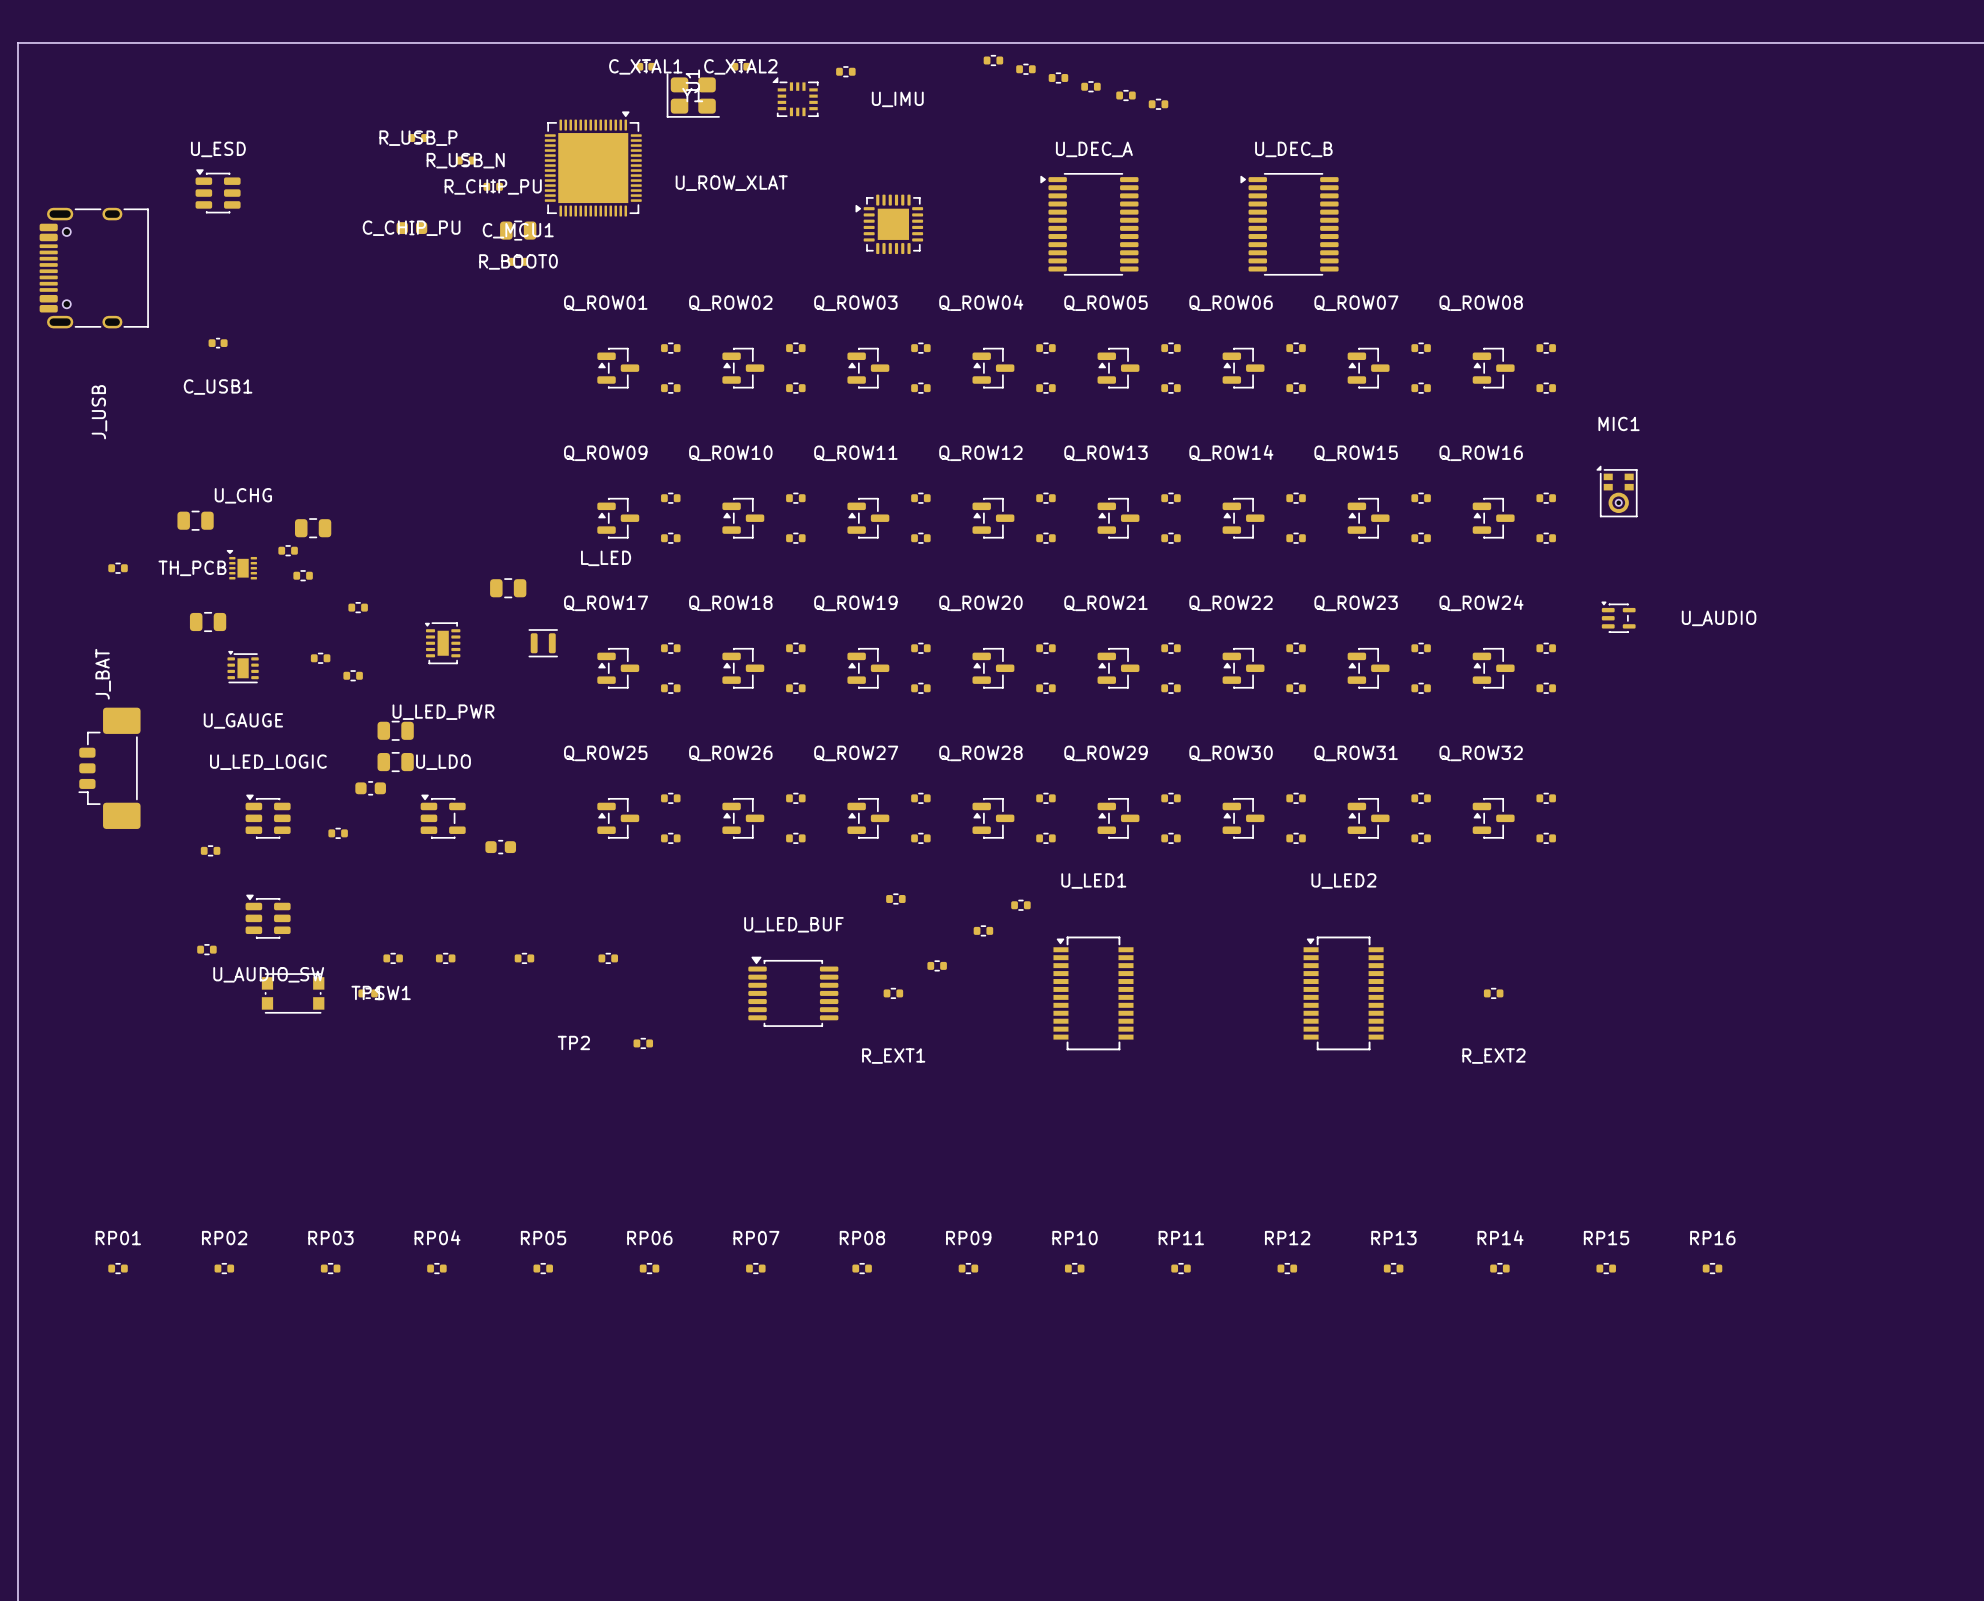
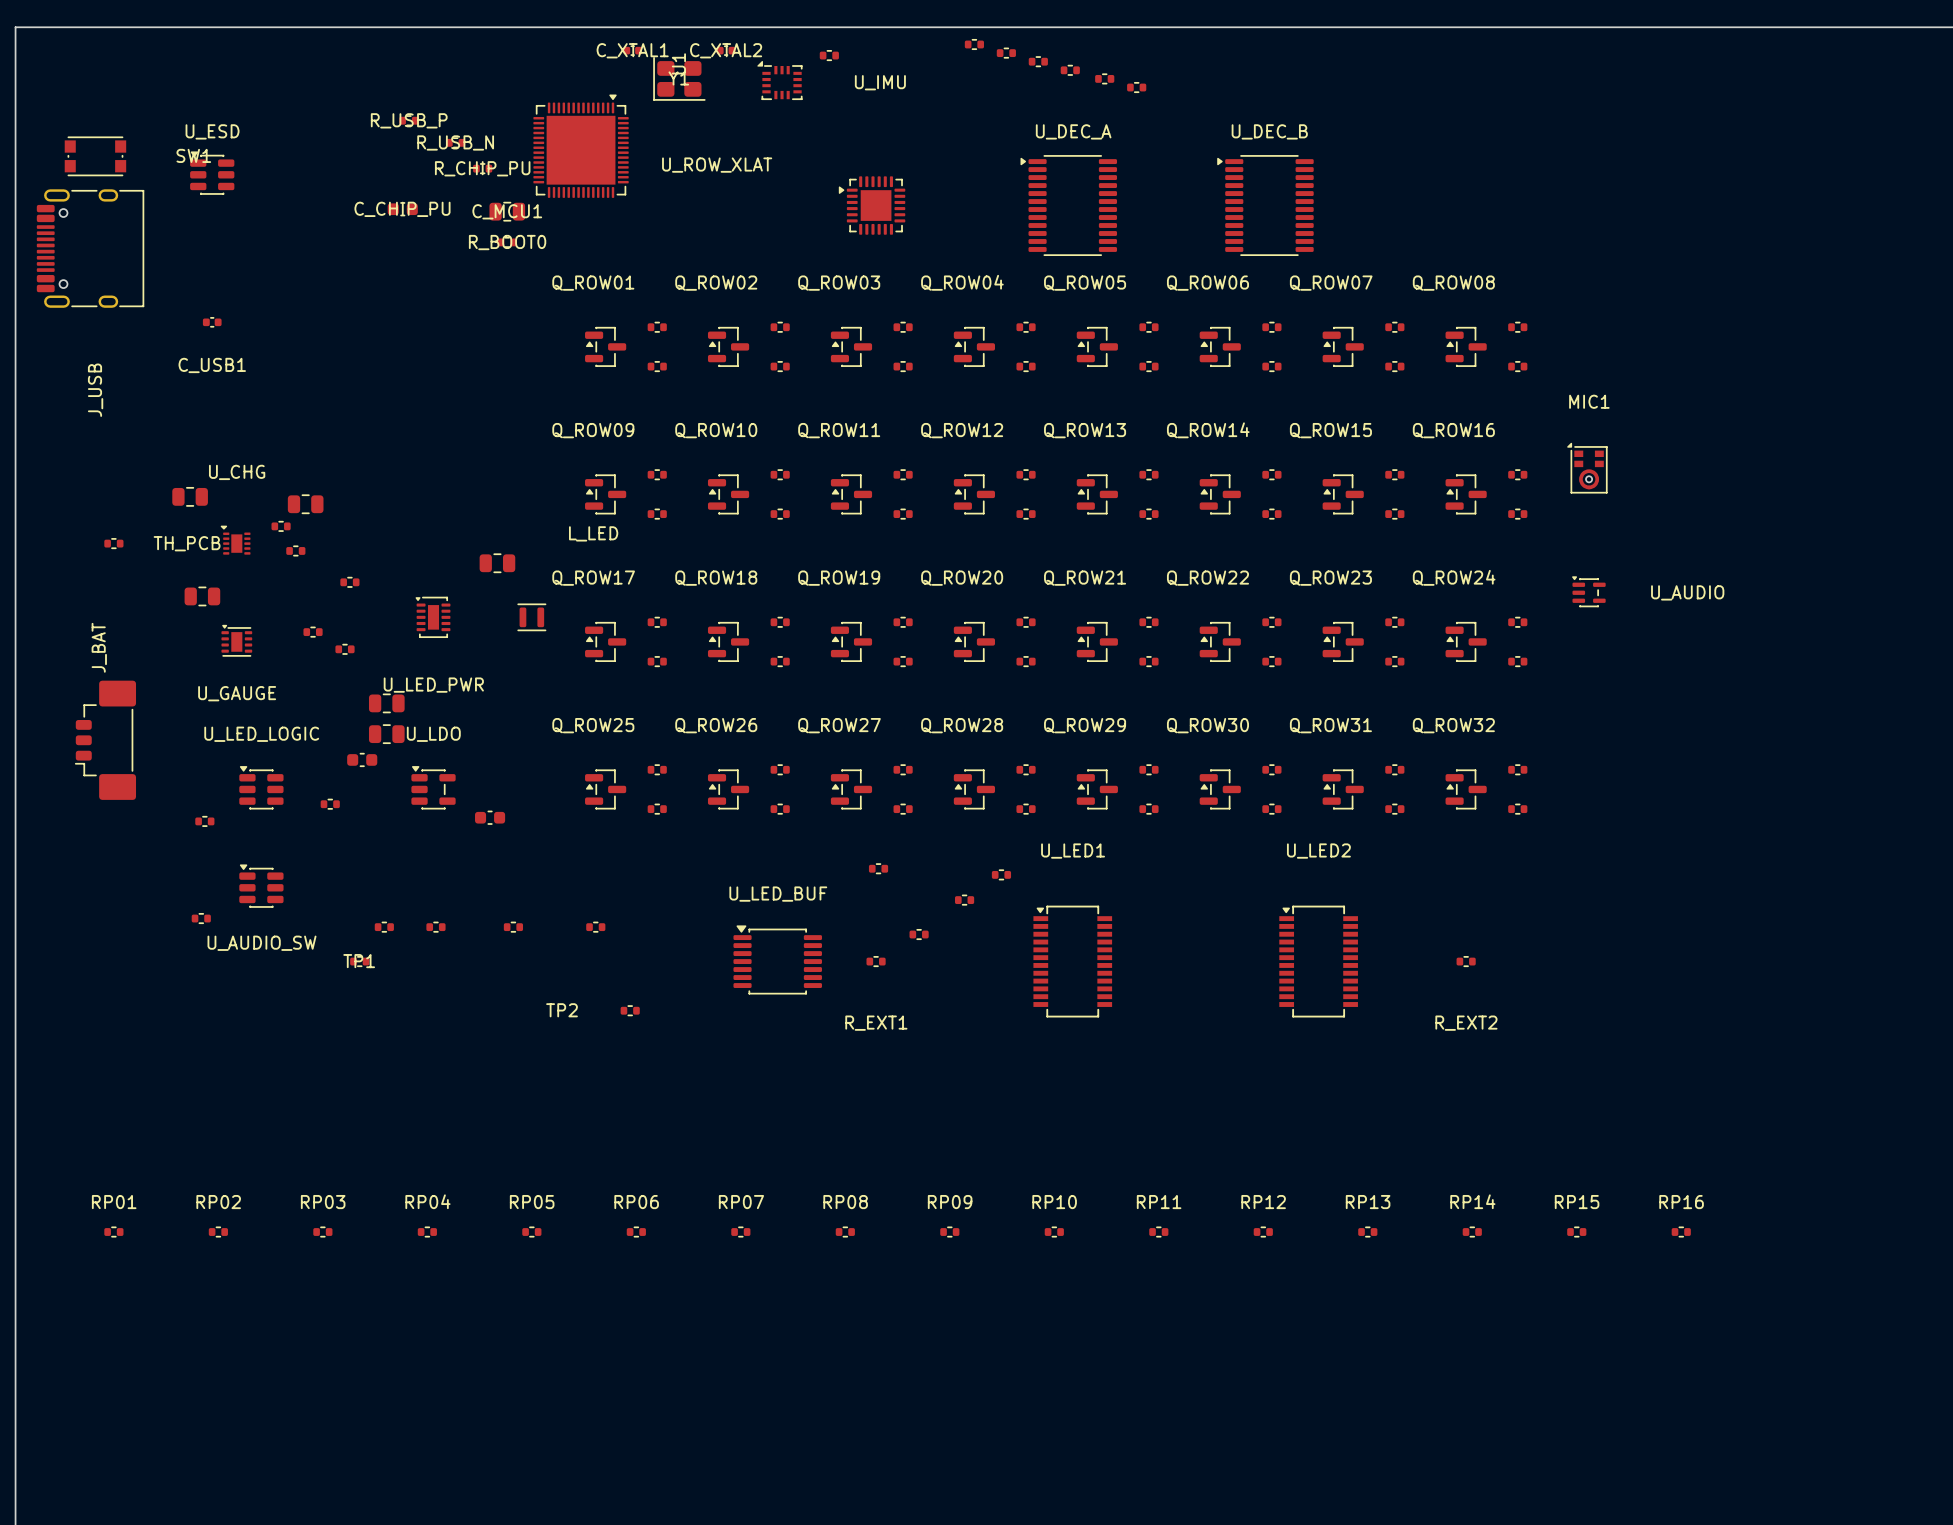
SW1 position: (293, 993) -> (95, 156)

